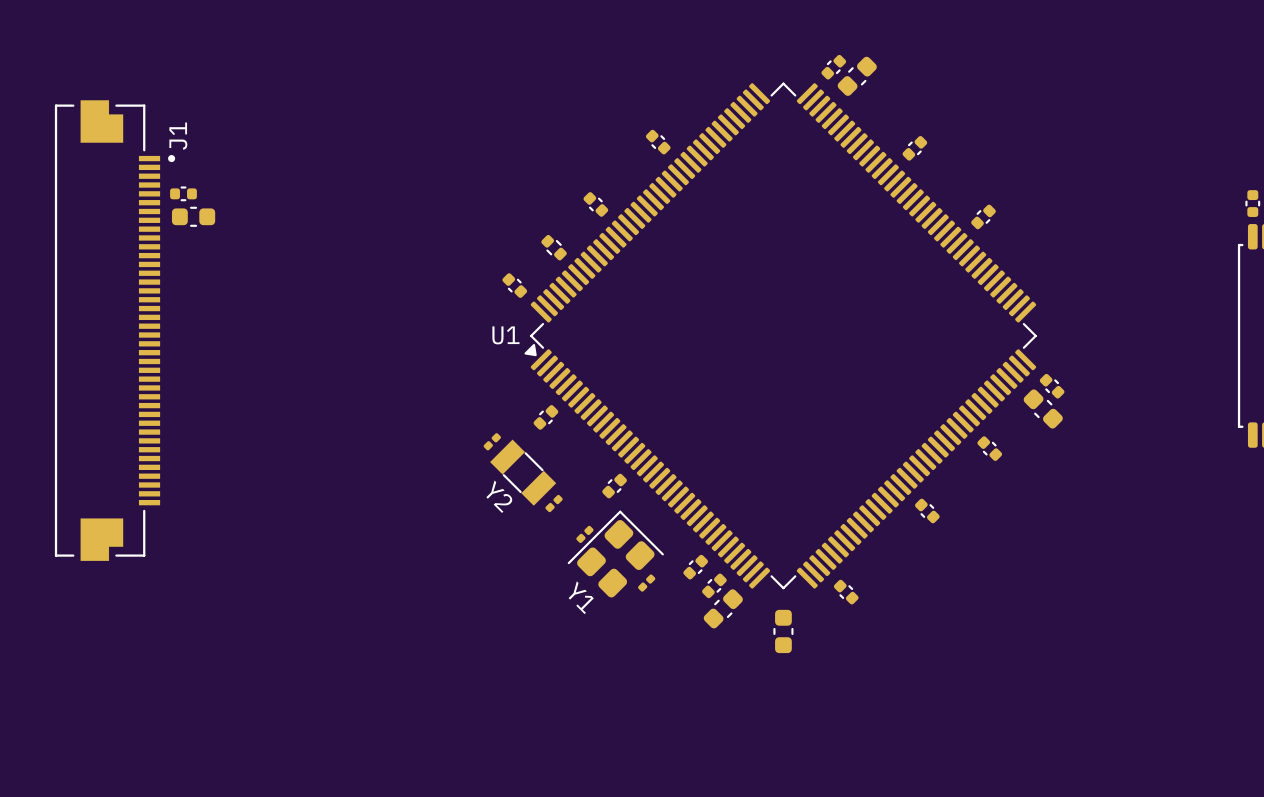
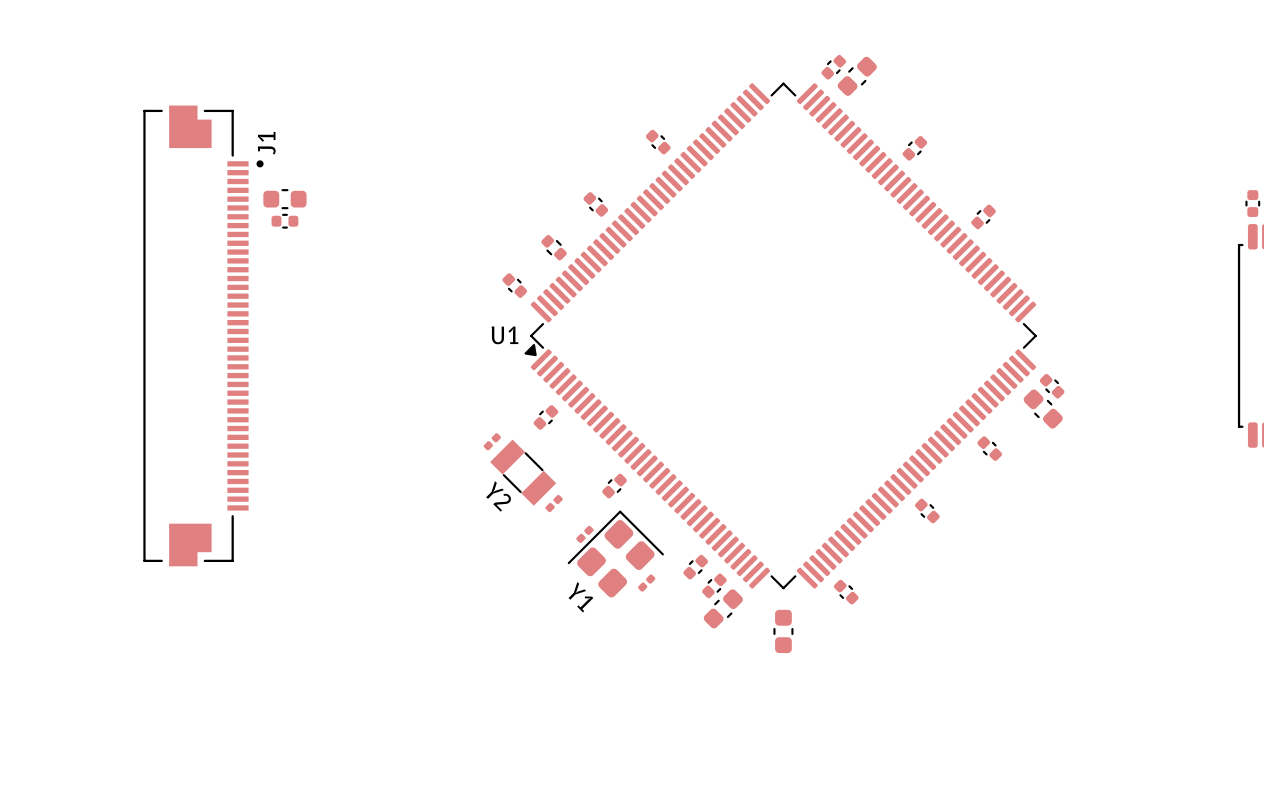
part position: (183, 193) -> (284, 221)
part position: (193, 216) -> (284, 199)
J1 position: (115, 330) -> (203, 335)

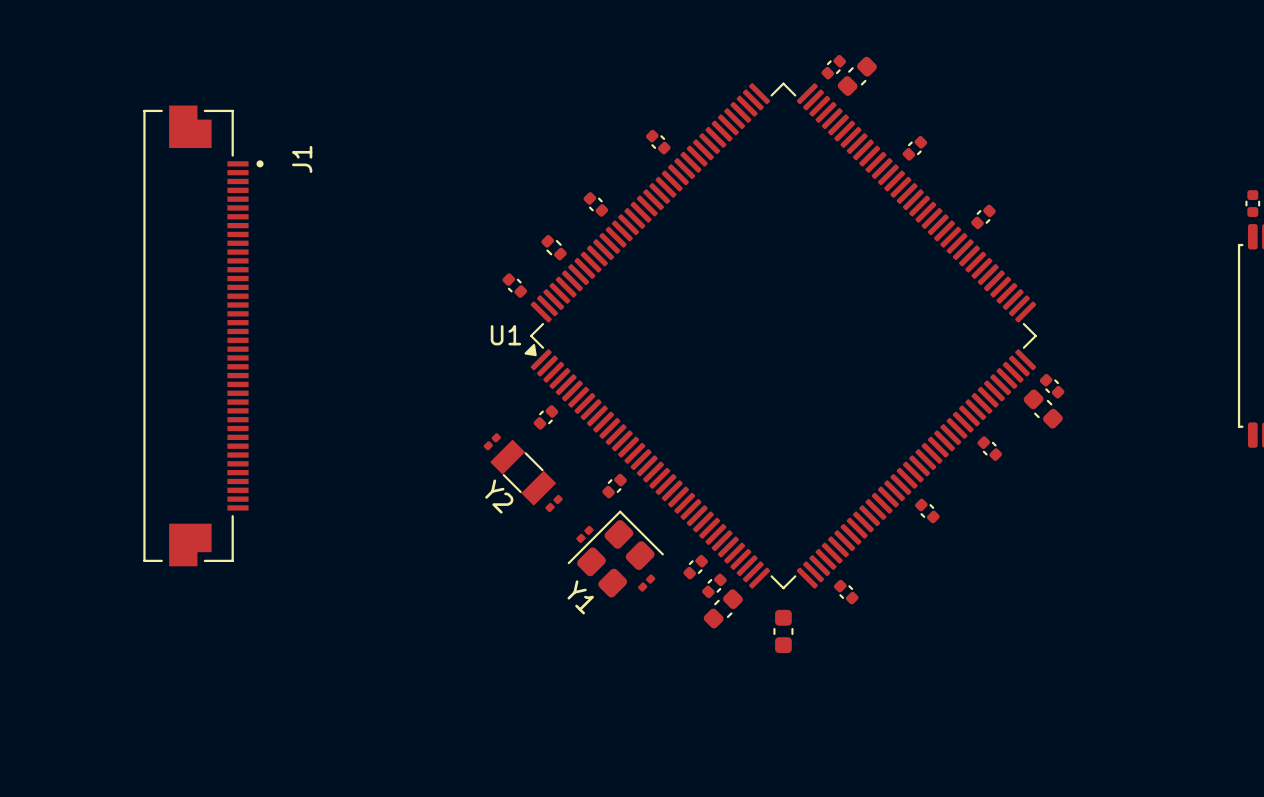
J1 name position: J1 (266, 143) -> J1 (302, 159)
part: (284, 199) -> none
part: (284, 221) -> none

